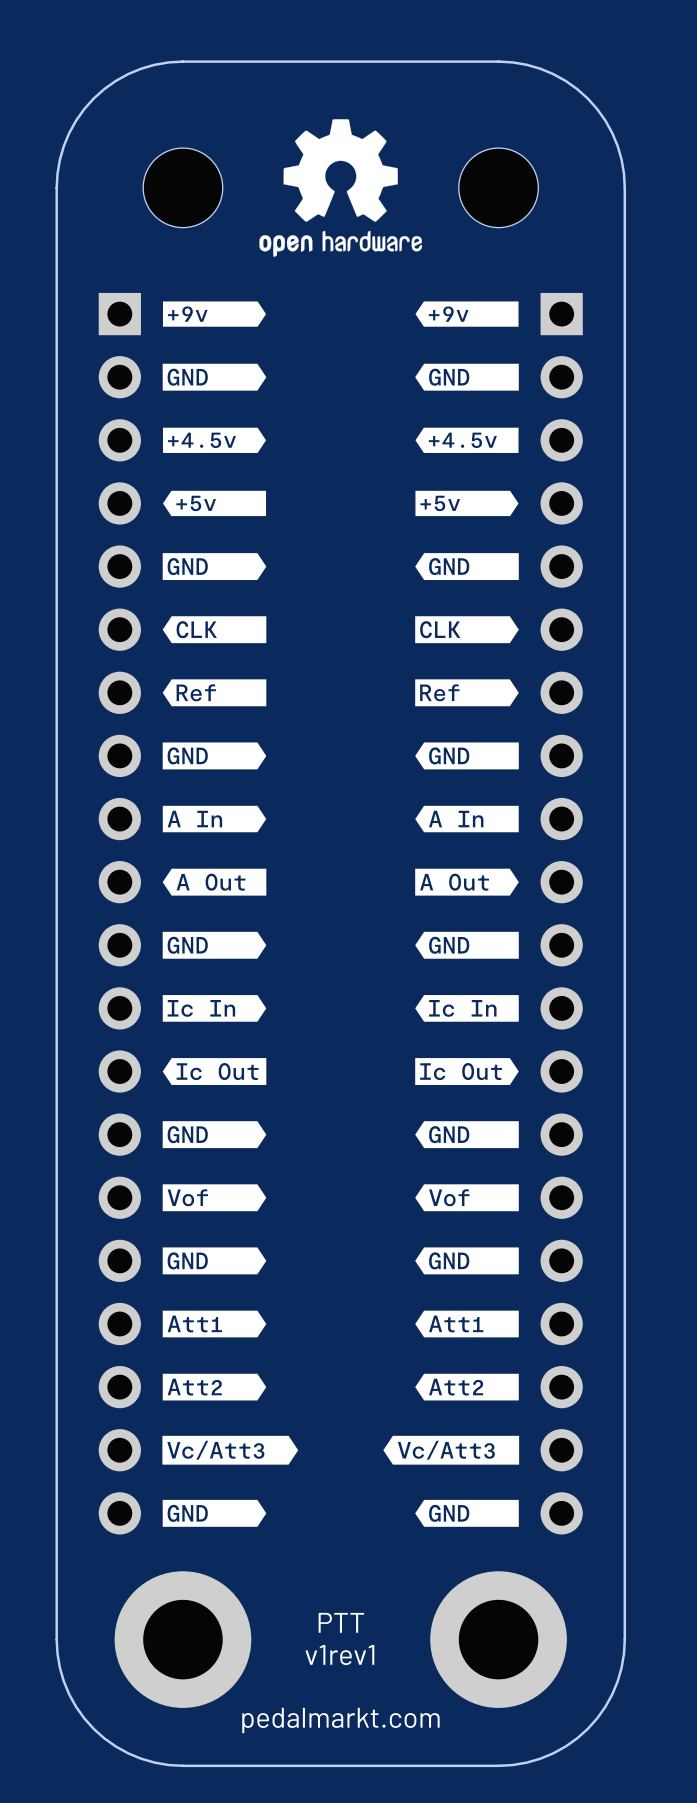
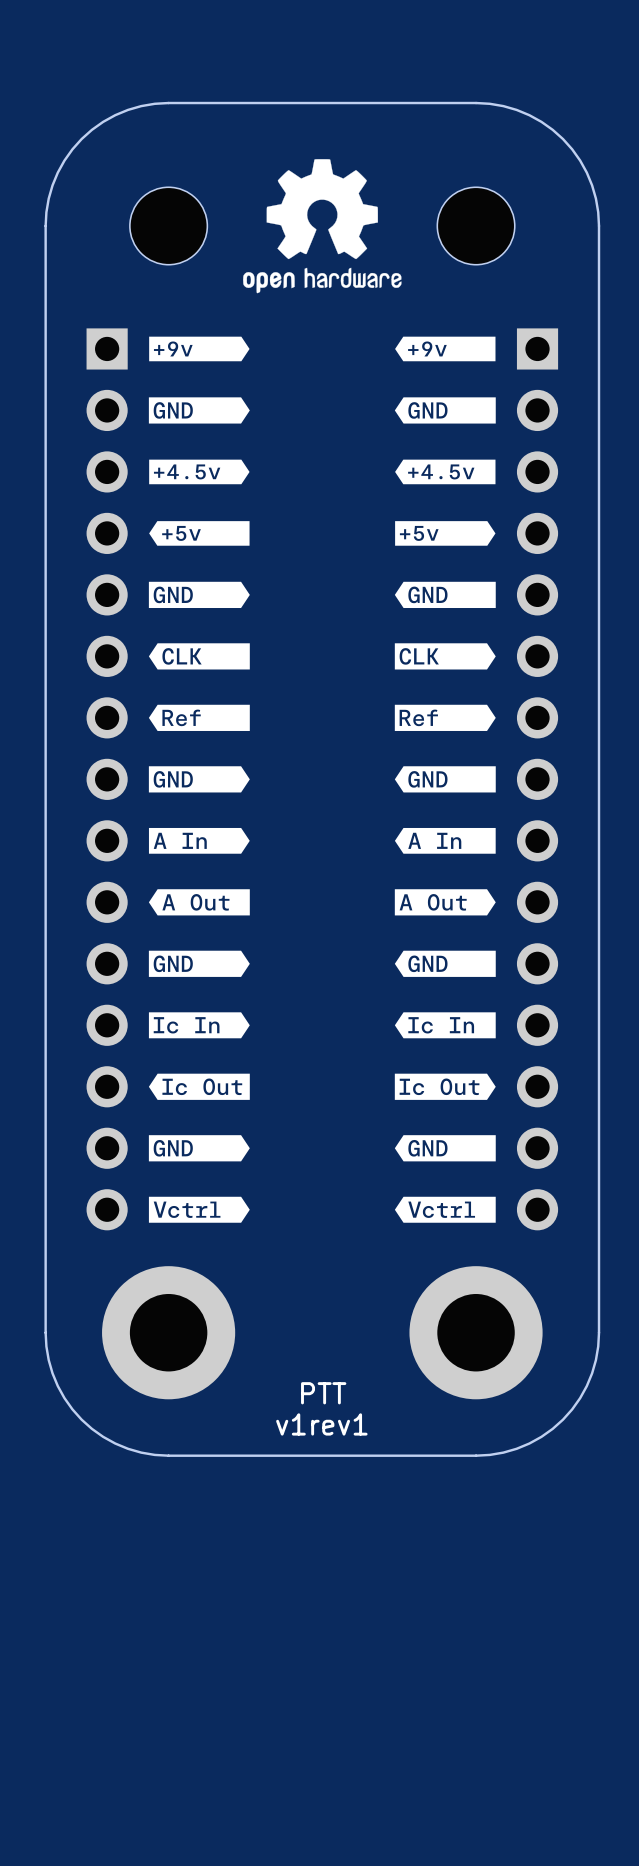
part: (119, 913) -> none
part: (561, 913) -> none
drawing shape: [162, 1184, 267, 1212] -> [148, 1196, 250, 1223]
drawing shape: [415, 1184, 519, 1212] -> [394, 1196, 496, 1223]
drawing: [162, 1247, 267, 1275] -> none
drawing: [415, 1247, 519, 1275] -> none
drawing: [162, 1310, 267, 1338] -> none
drawing: [415, 1310, 519, 1338] -> none
part: none -> (168, 1332)
part: none -> (476, 1332)
board edge: (624, 1324) (624, 1639) (621, 1667) (612, 1694) (605, 1706) (597, 1718) (577, 1738) (565, 1746) (540, 1758) (526, 1762) (498, 1765) (168, 1765) (141, 1758) (128, 1753) (104, 1738) (93, 1728) (84, 1718) (69, 1694) (63, 1681) (57, 1653) (56, 1324) -> (599, 1332) (598, 1346) (592, 1373) (580, 1398) (562, 1419) (541, 1436) (529, 1443) (503, 1452) (476, 1455) (168, 1455) (141, 1452) (115, 1443) (103, 1436) (81, 1419) (72, 1409) (64, 1398) (52, 1373) (46, 1346) (45, 1332)
drawing: [162, 1373, 267, 1401] -> none
drawing: [415, 1373, 519, 1401] -> none
drawing: [162, 1435, 299, 1465] -> none
drawing: [383, 1435, 520, 1465] -> none
drawing: [162, 1499, 267, 1527] -> none
drawing: [415, 1499, 519, 1527] -> none
text position: PTT (341, 1622) -> PTT (323, 1393)
part: (182, 1639) -> none
part: (498, 1639) -> none
text position: v1rev1 (339, 1654) -> v1rev1 (321, 1424)
text: pedalmarkt.com (340, 1720) -> none

